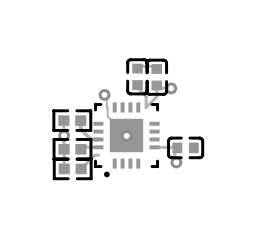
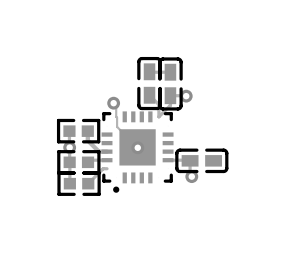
part footprint: [126, 58, 149, 96] -> [137, 56, 162, 111]
part footprint: [145, 58, 169, 96] -> [158, 57, 183, 111]
part footprint: [167, 136, 205, 160] -> [175, 148, 229, 174]

